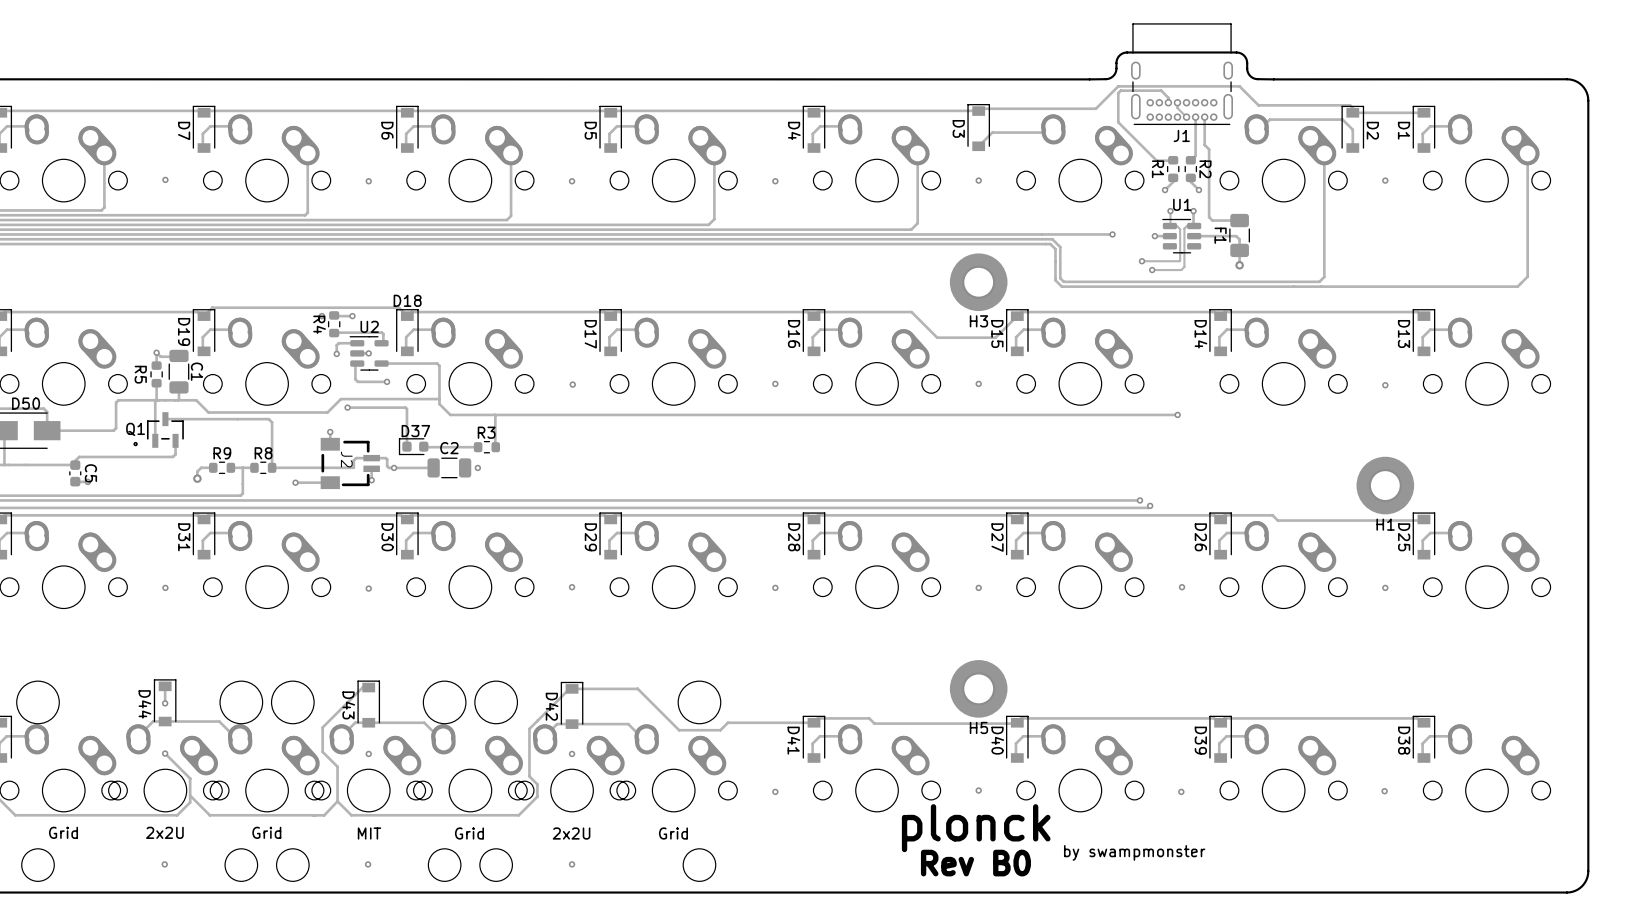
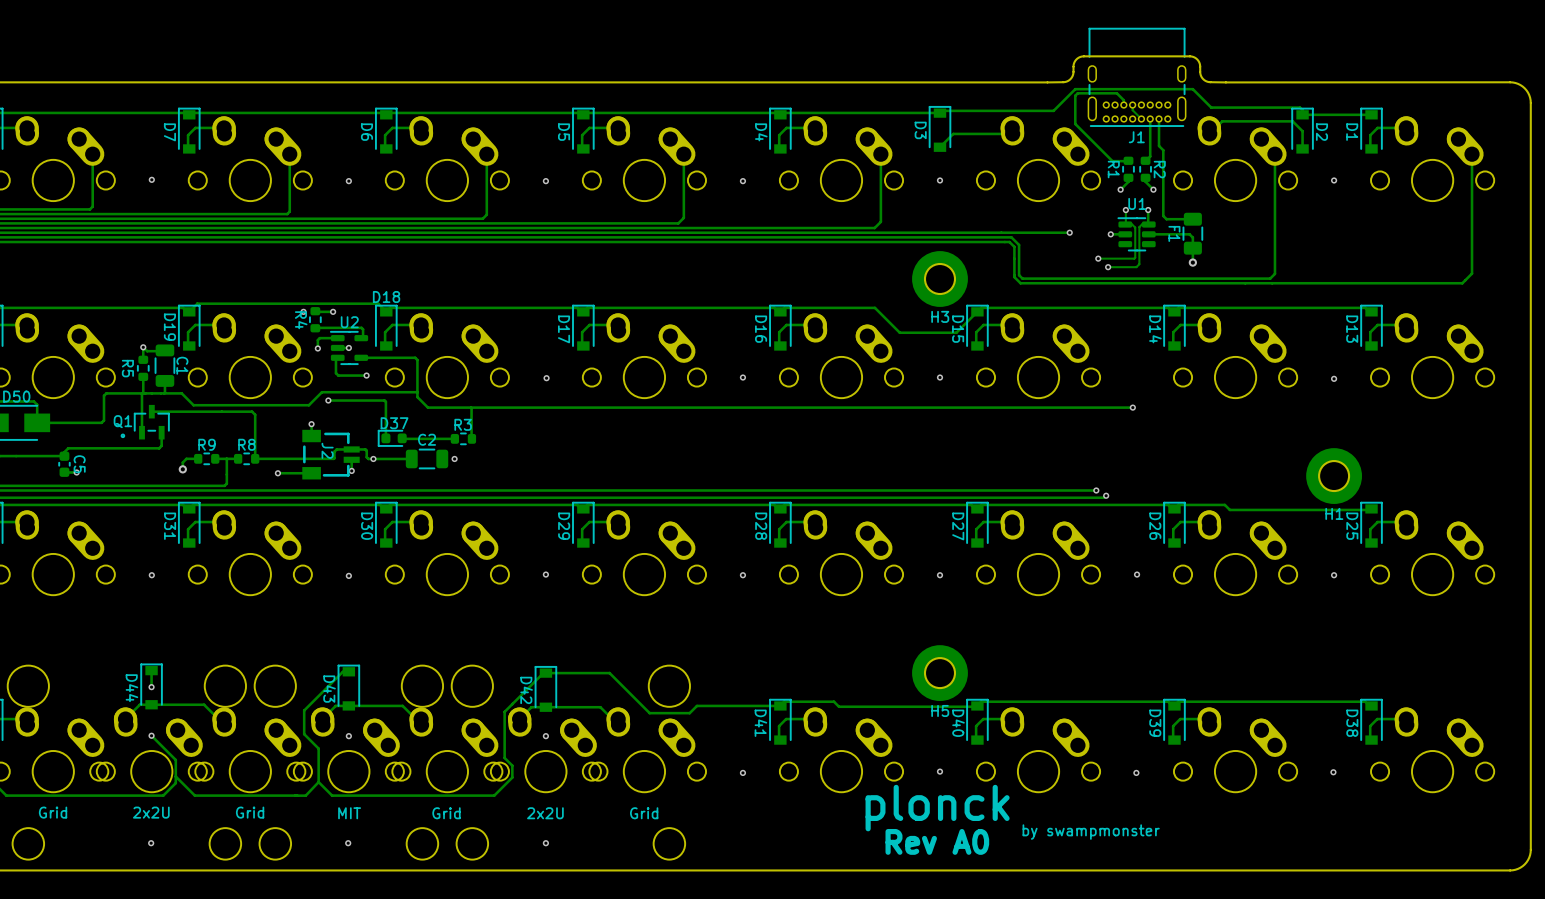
text: Rev B0 (975, 863) -> Rev A0 (937, 841)

